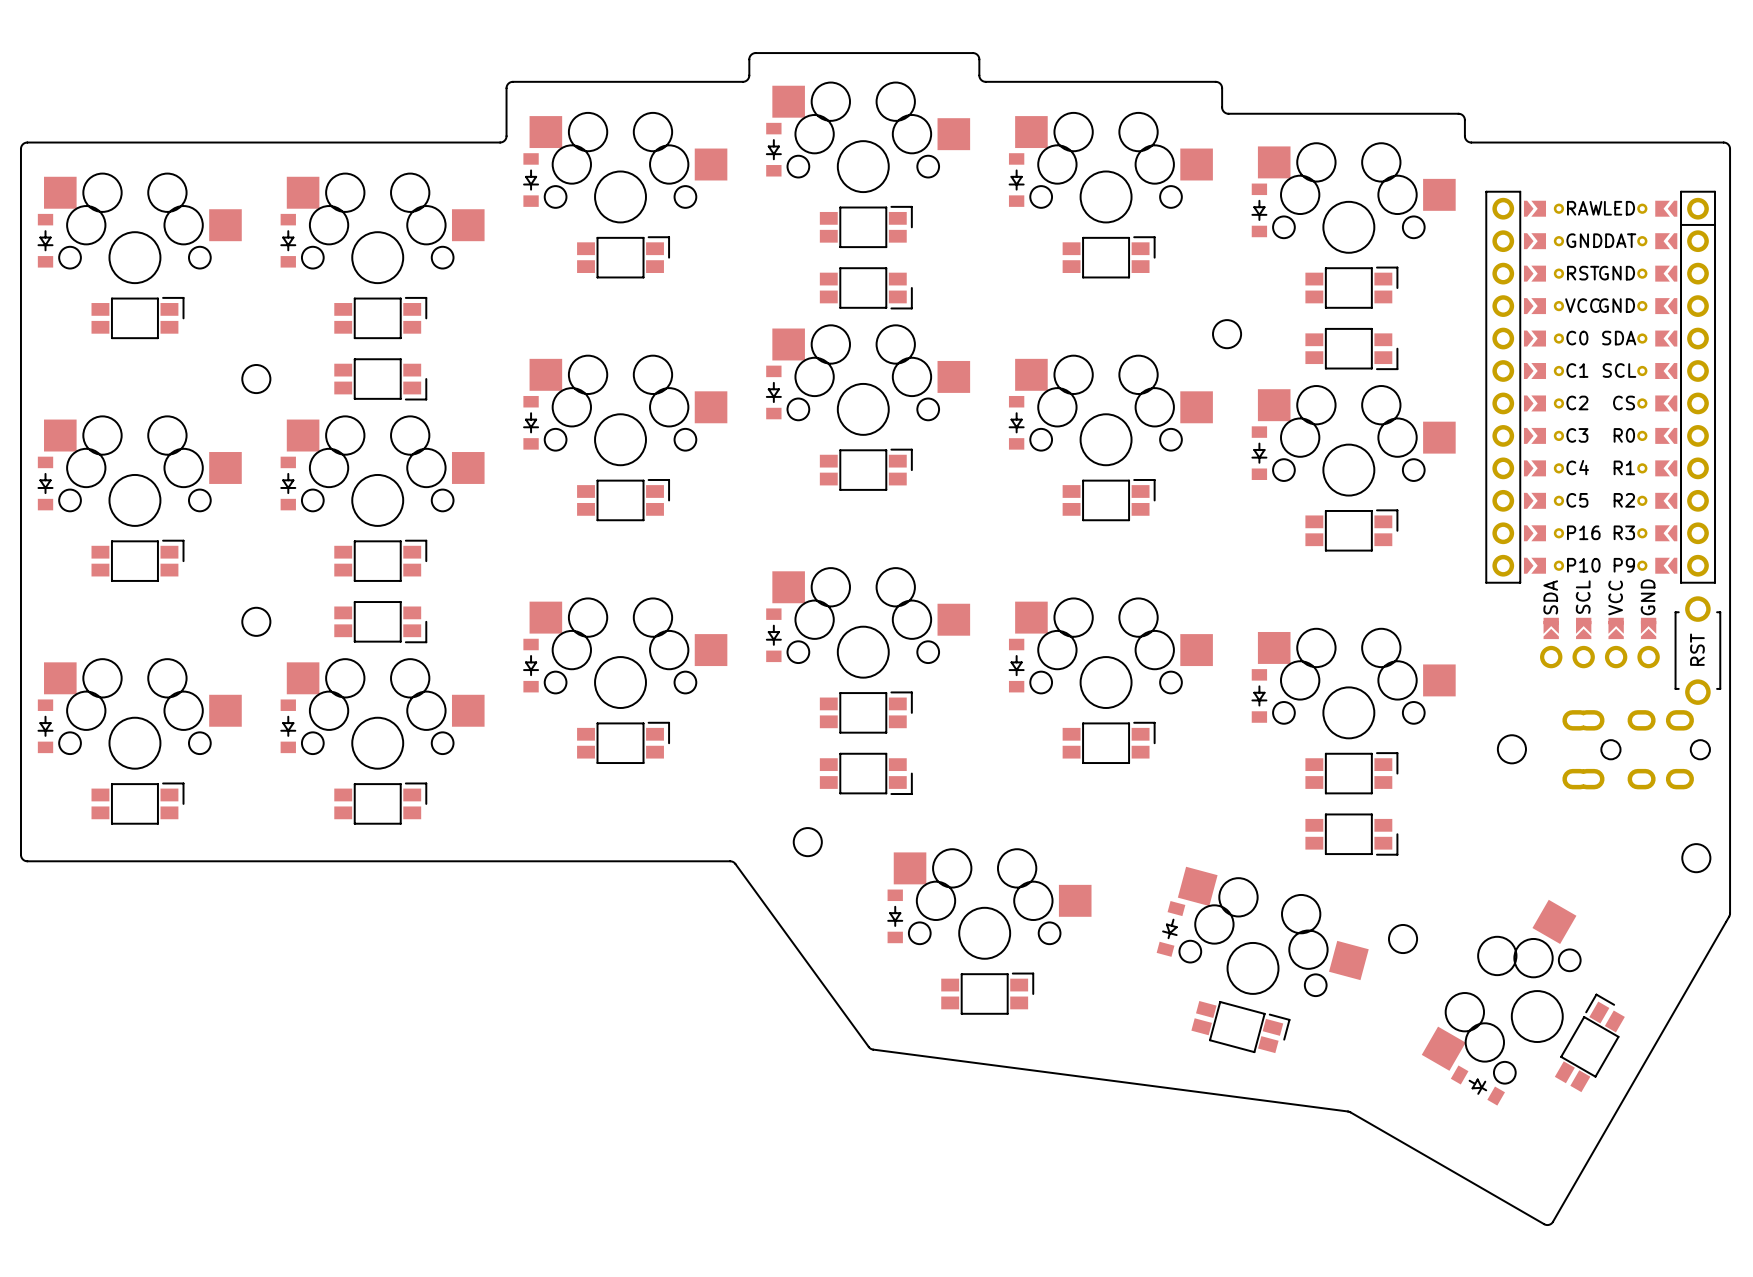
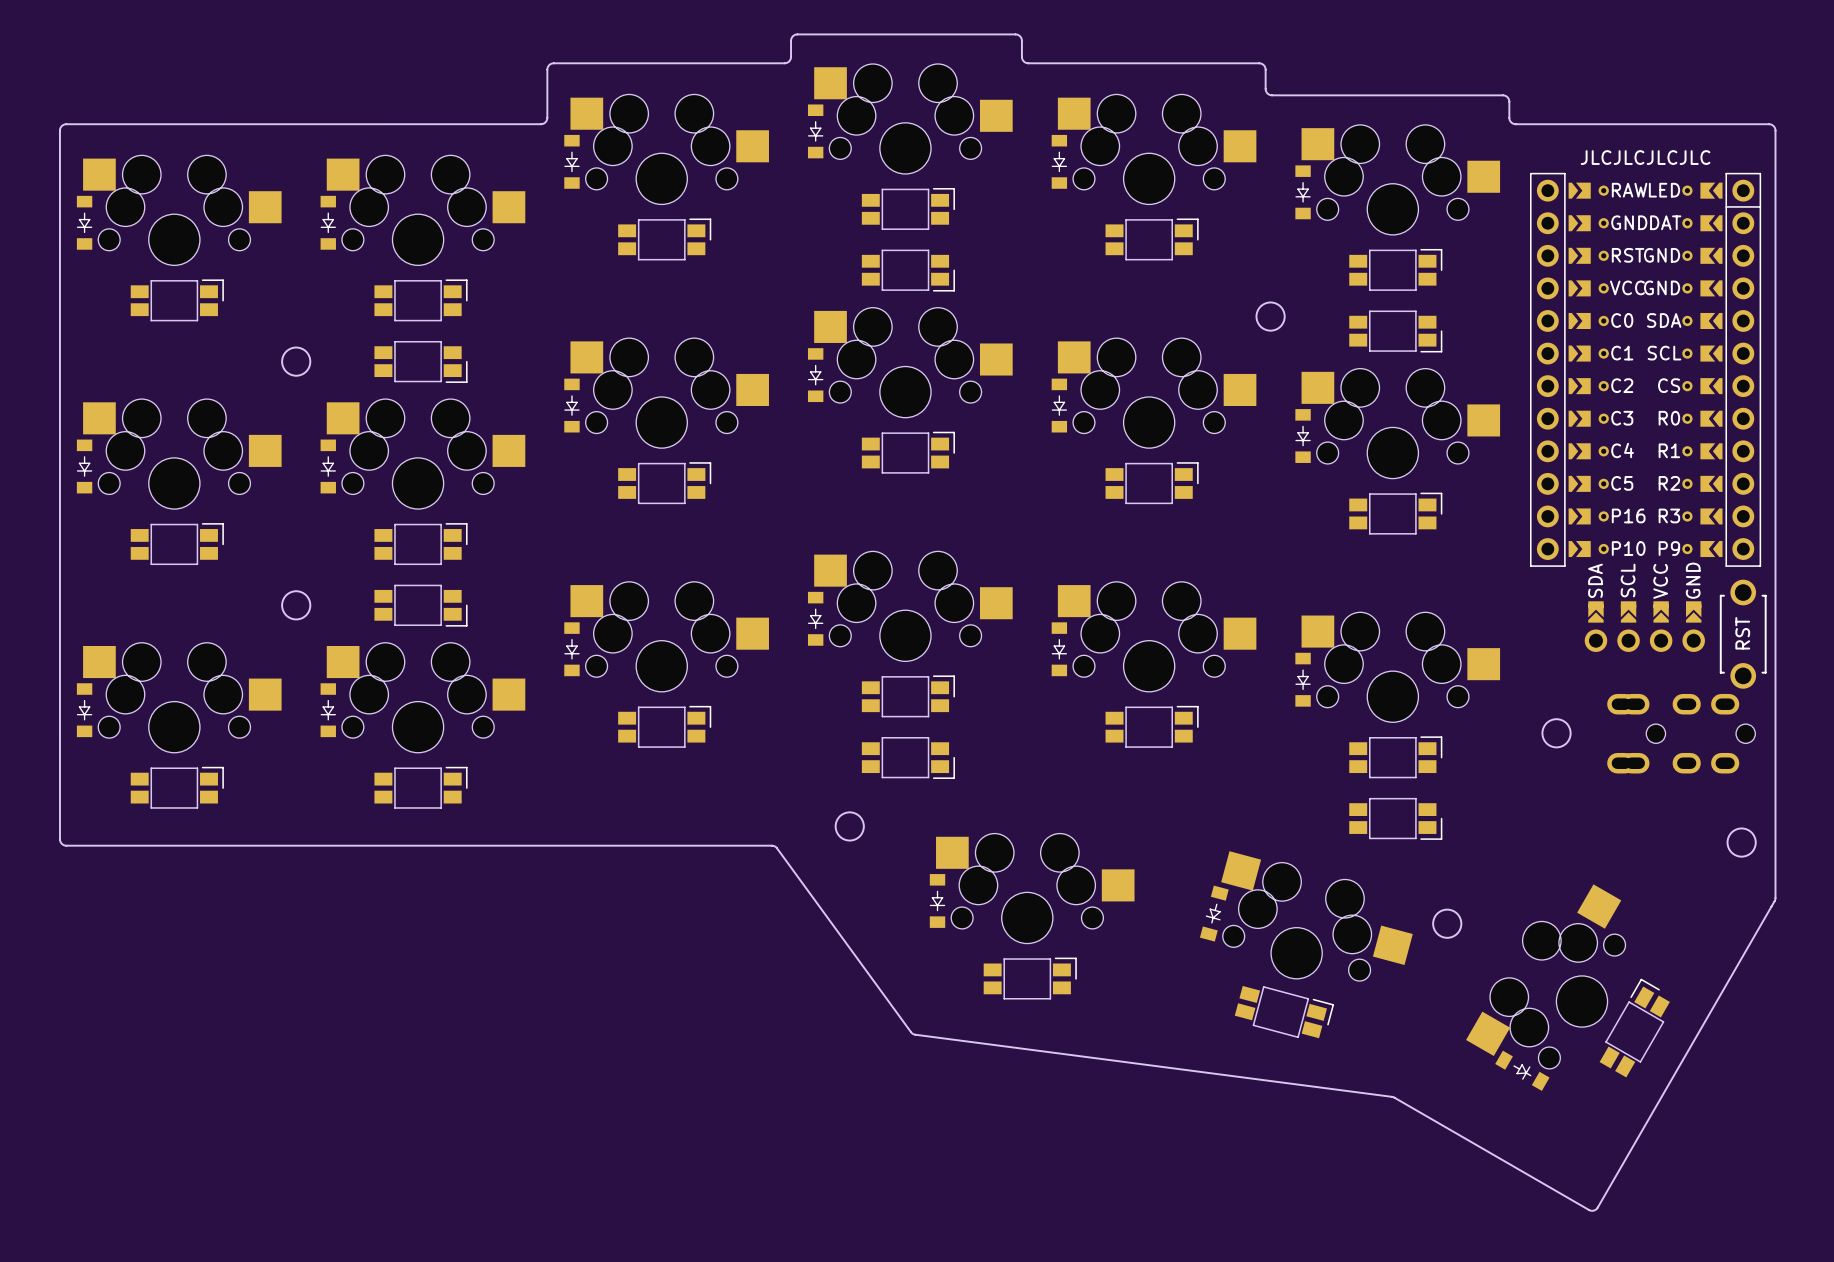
text: none -> JLCJLCJLCJLC (1645, 157)

